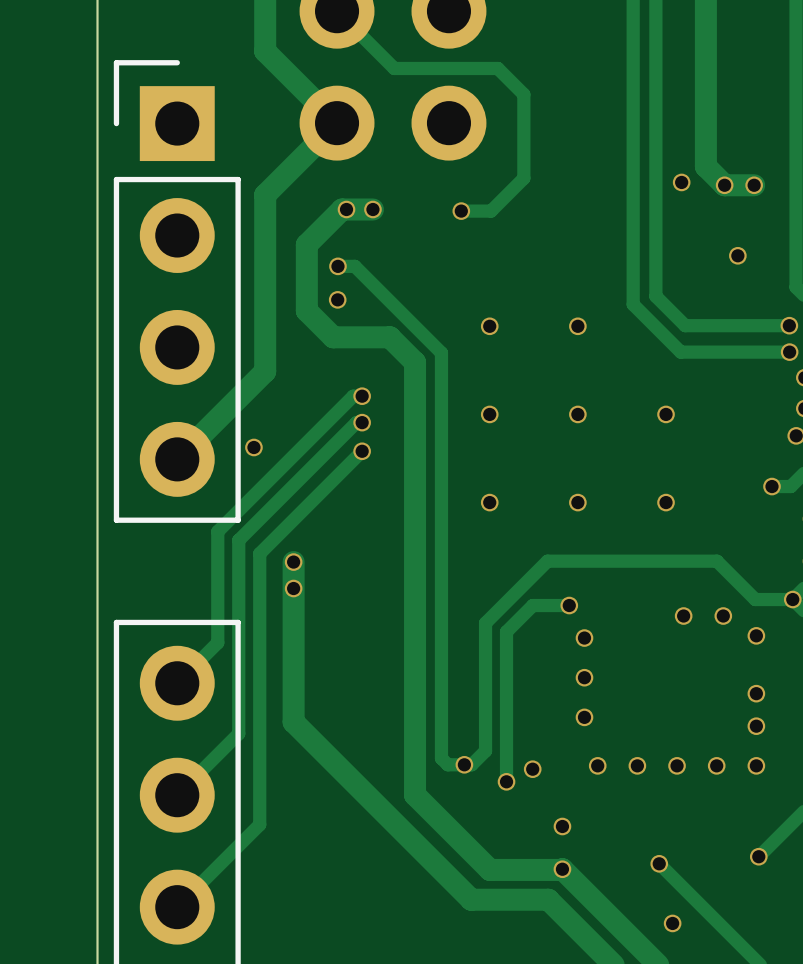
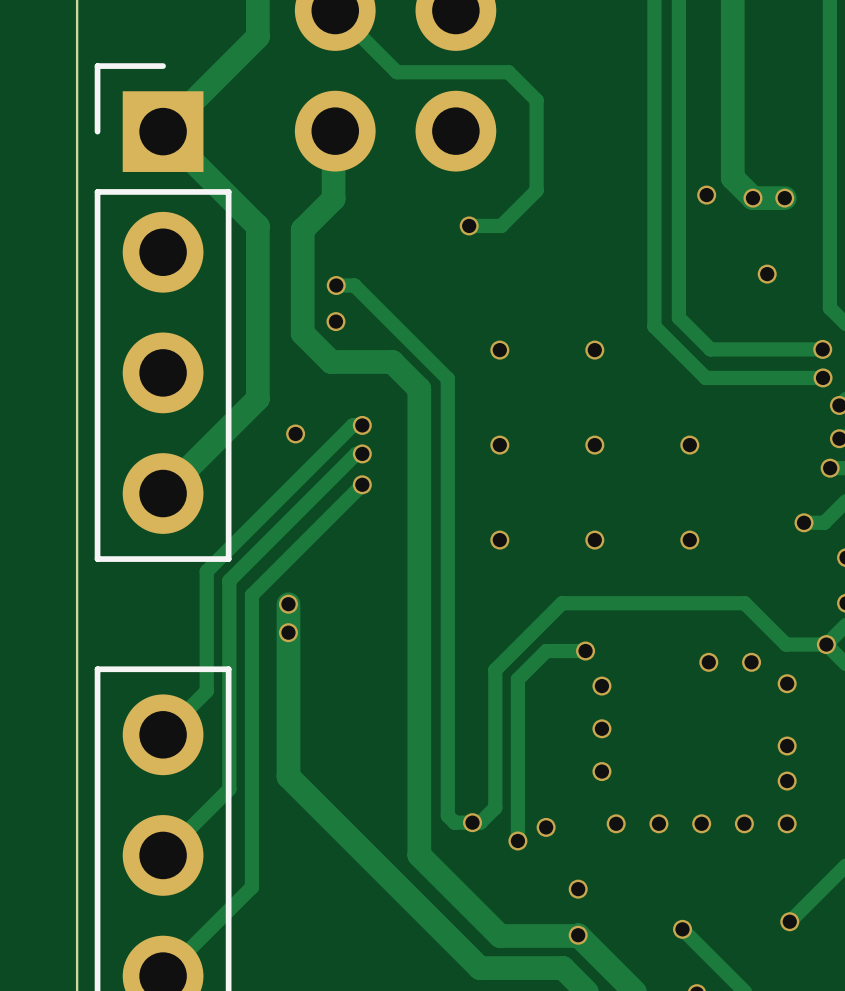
track: (265, 35) (265, 51) (337, 123) -> (257, 36) (163, 131) (257, 226)
track: (335, 124) (265, 194) (265, 211) -> (333, 132) (333, 198) (302, 229) (302, 262)
via: (346, 209) -> none
track: (372, 209) (342, 209) (306, 244) -> none
via: (372, 209) -> none
via position: (253, 447) -> (295, 433)

